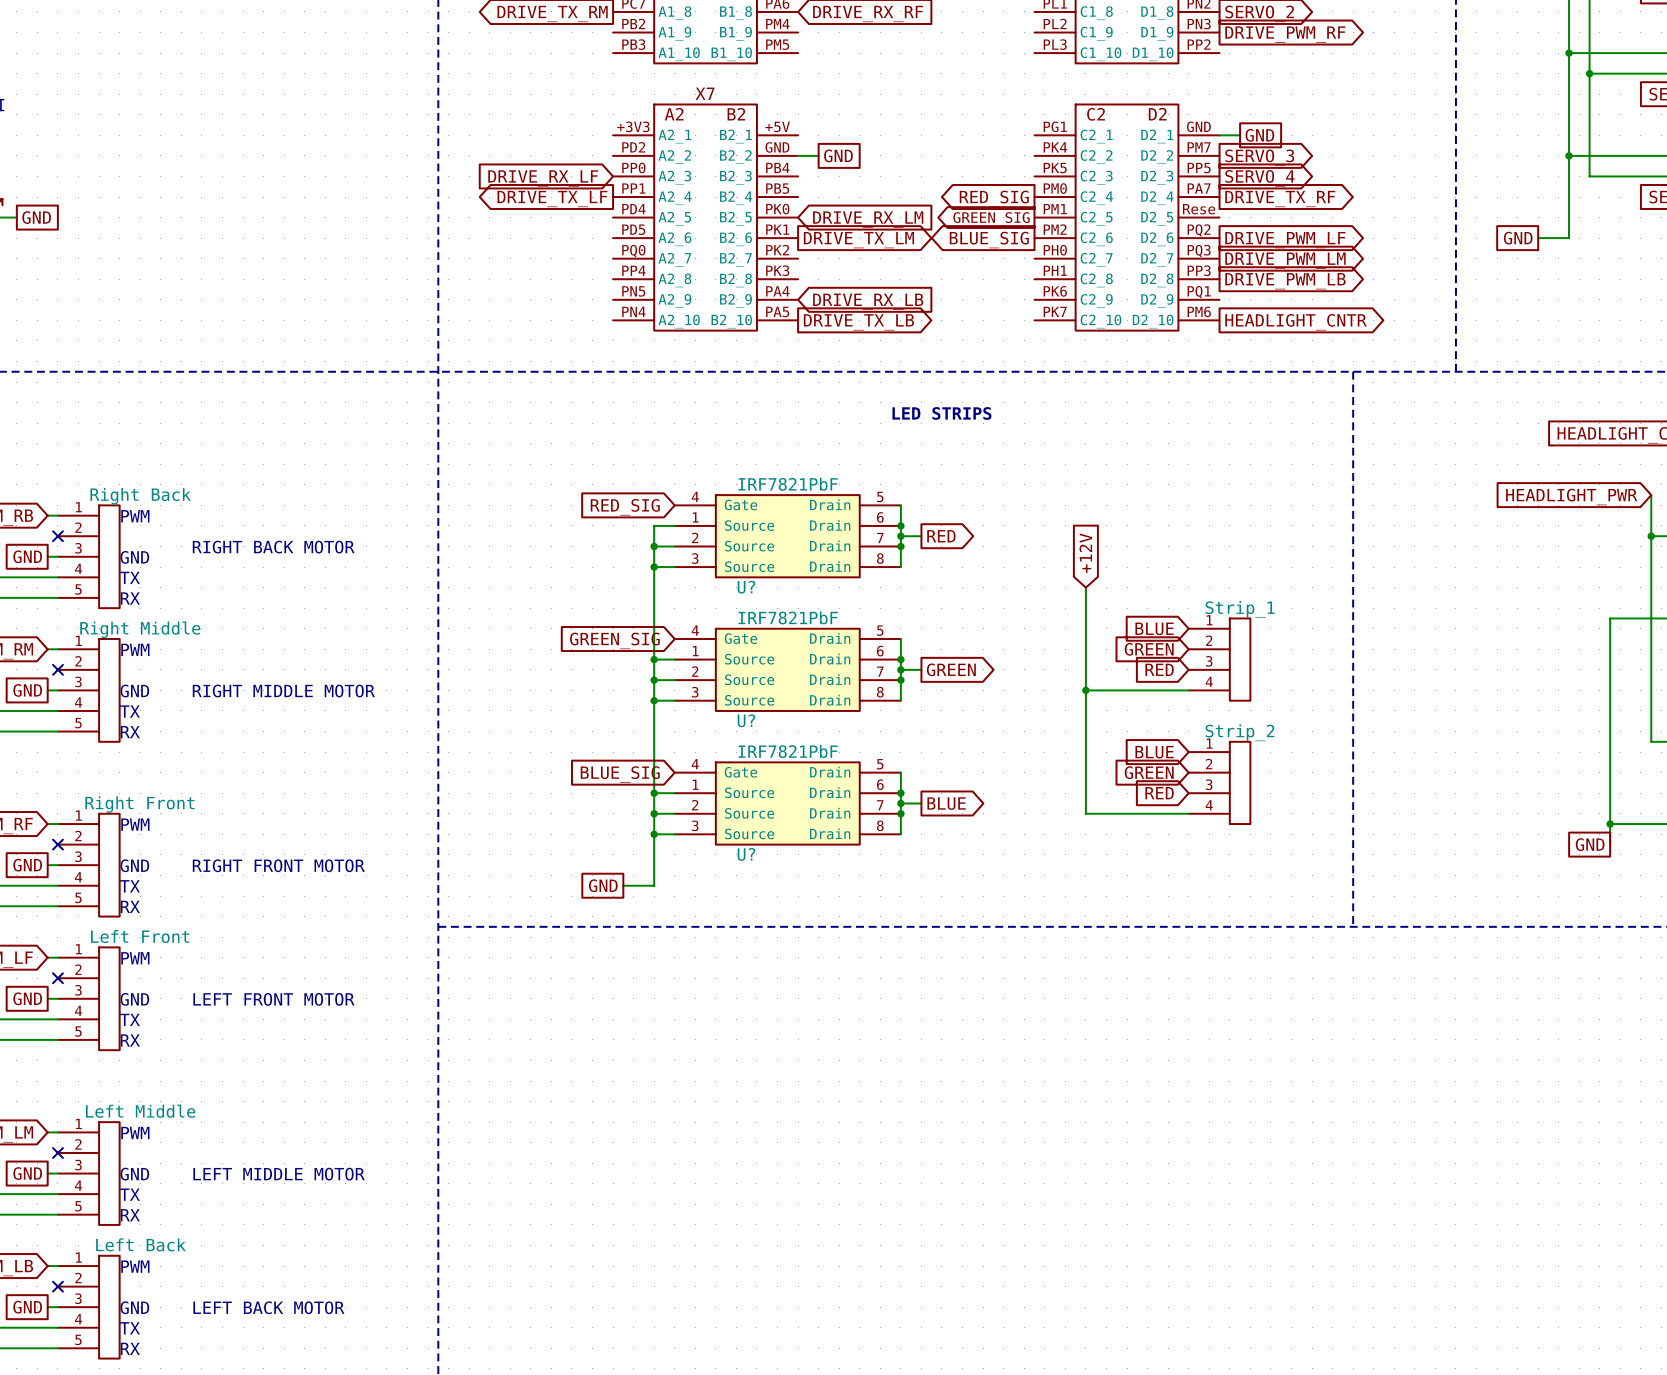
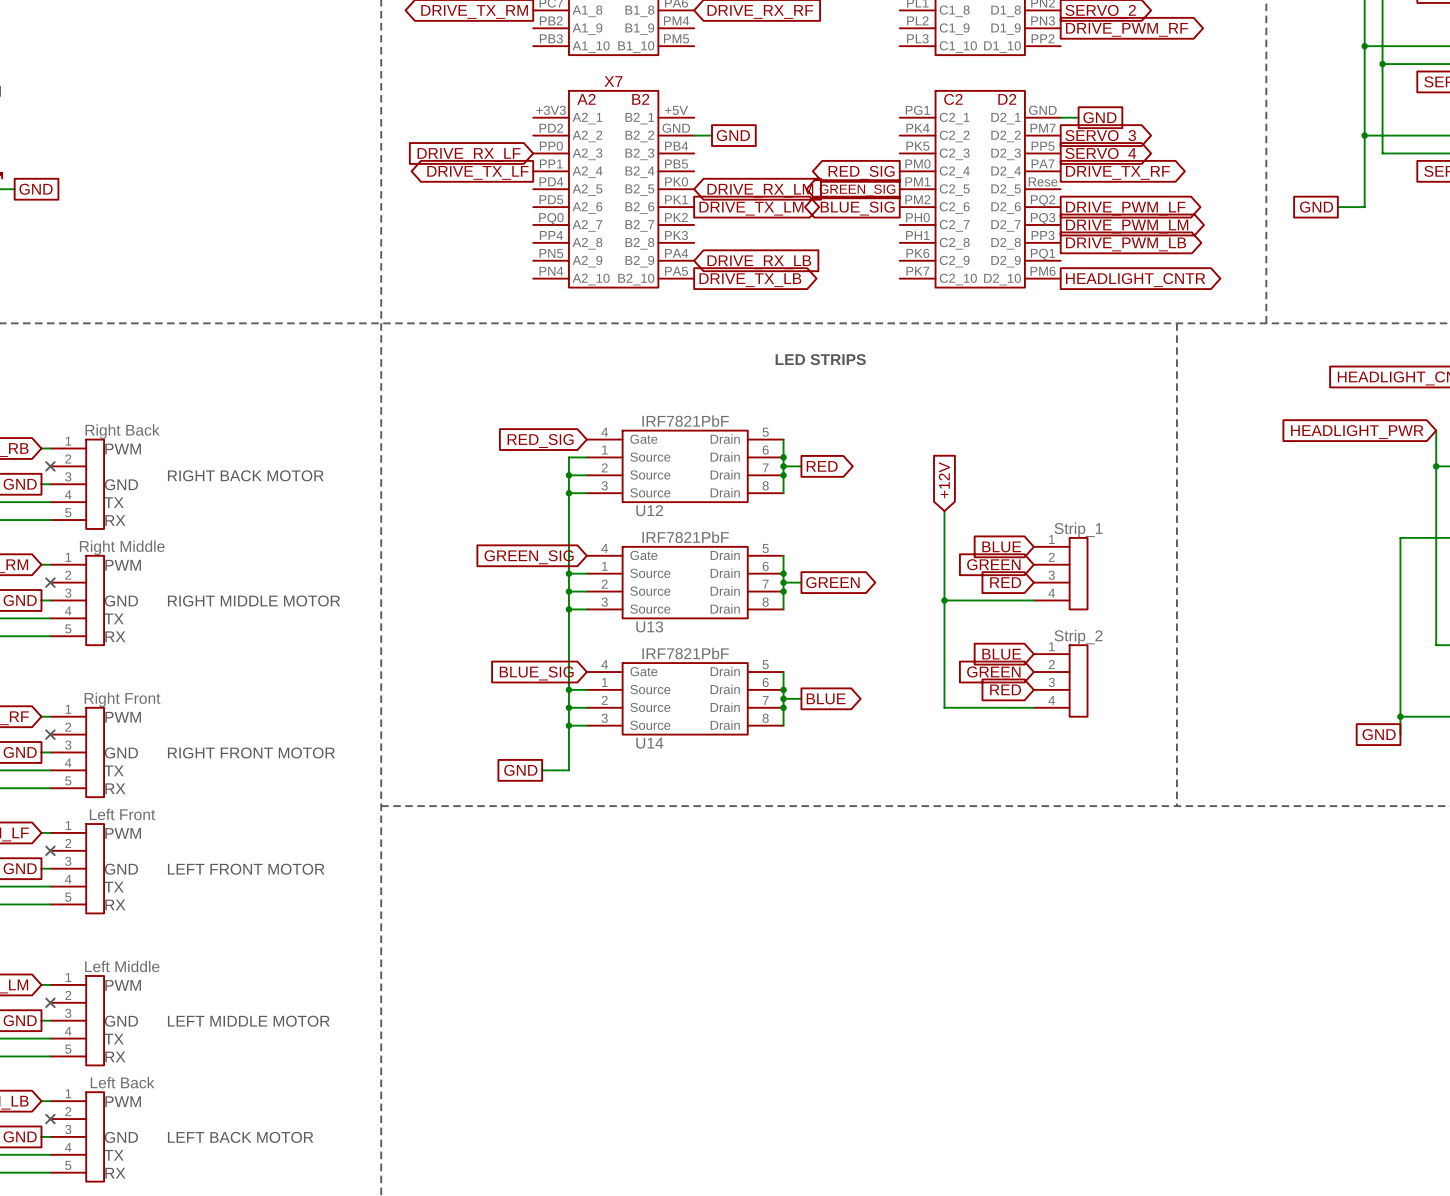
U? name: U? (746, 587) -> U12 (649, 510)
U? name: U? (746, 720) -> U13 (649, 626)
U? name: U? (746, 854) -> U14 (649, 743)

